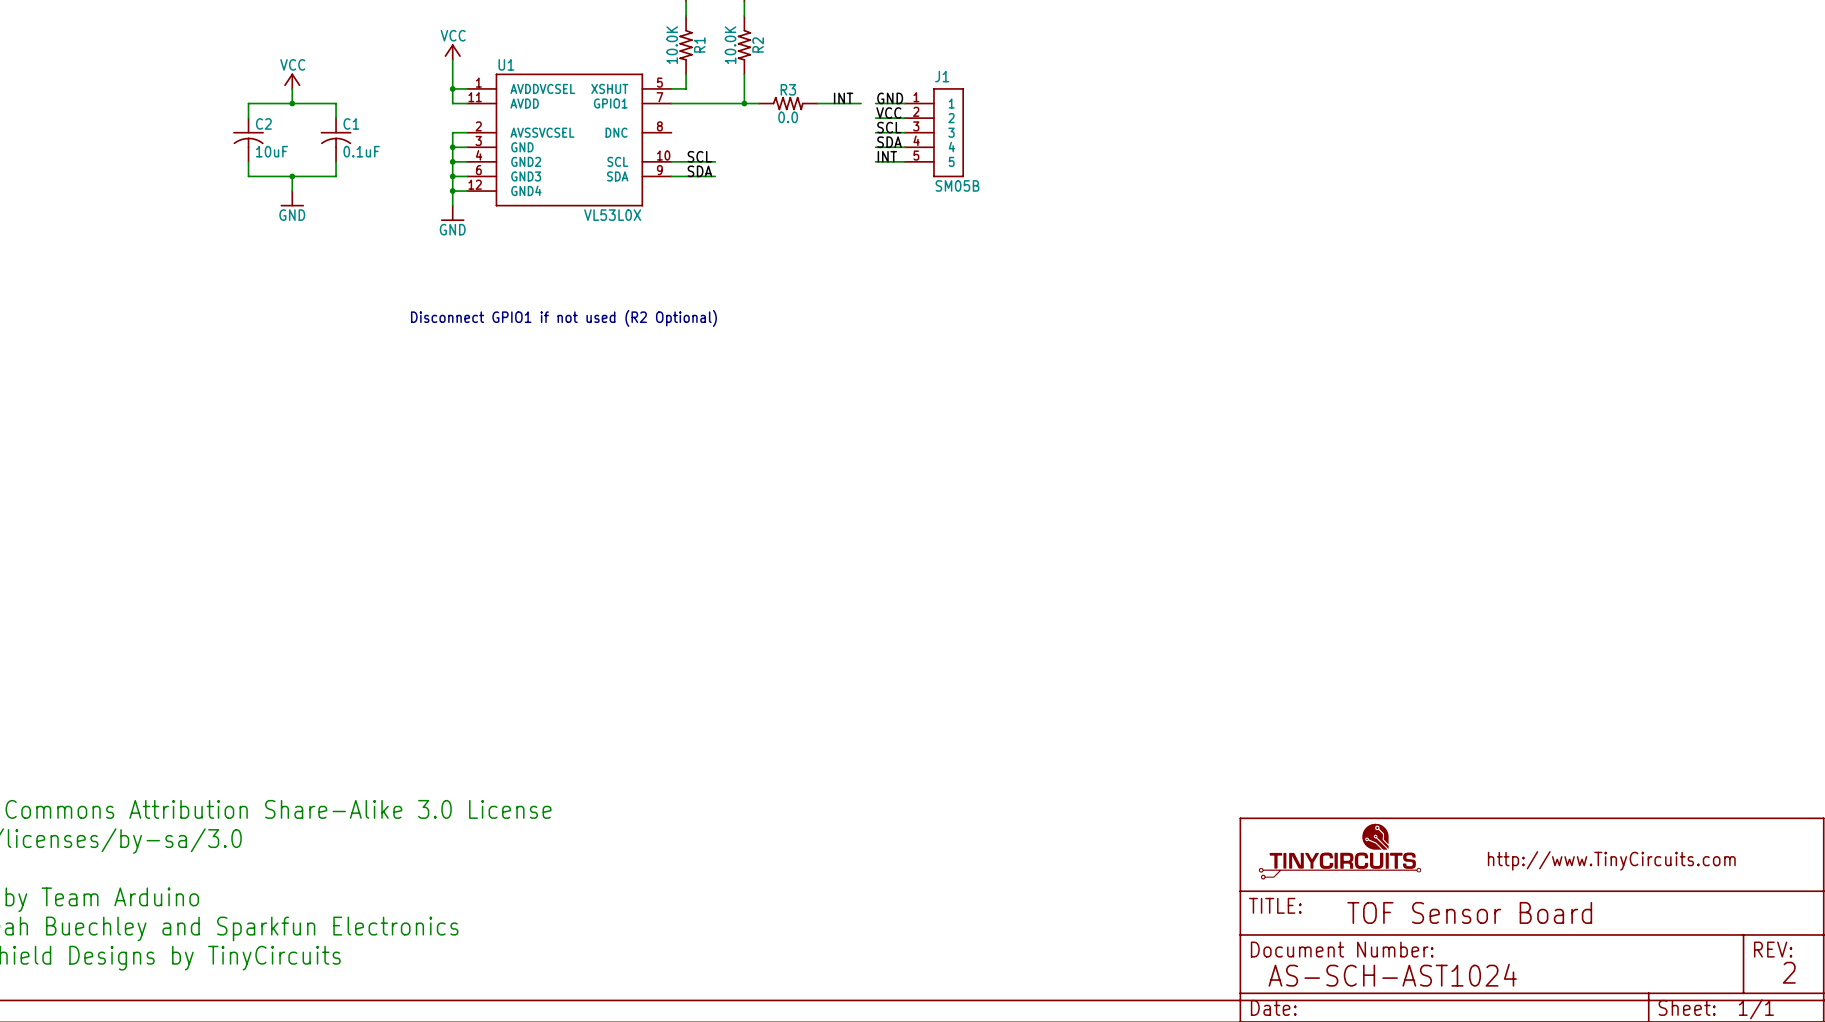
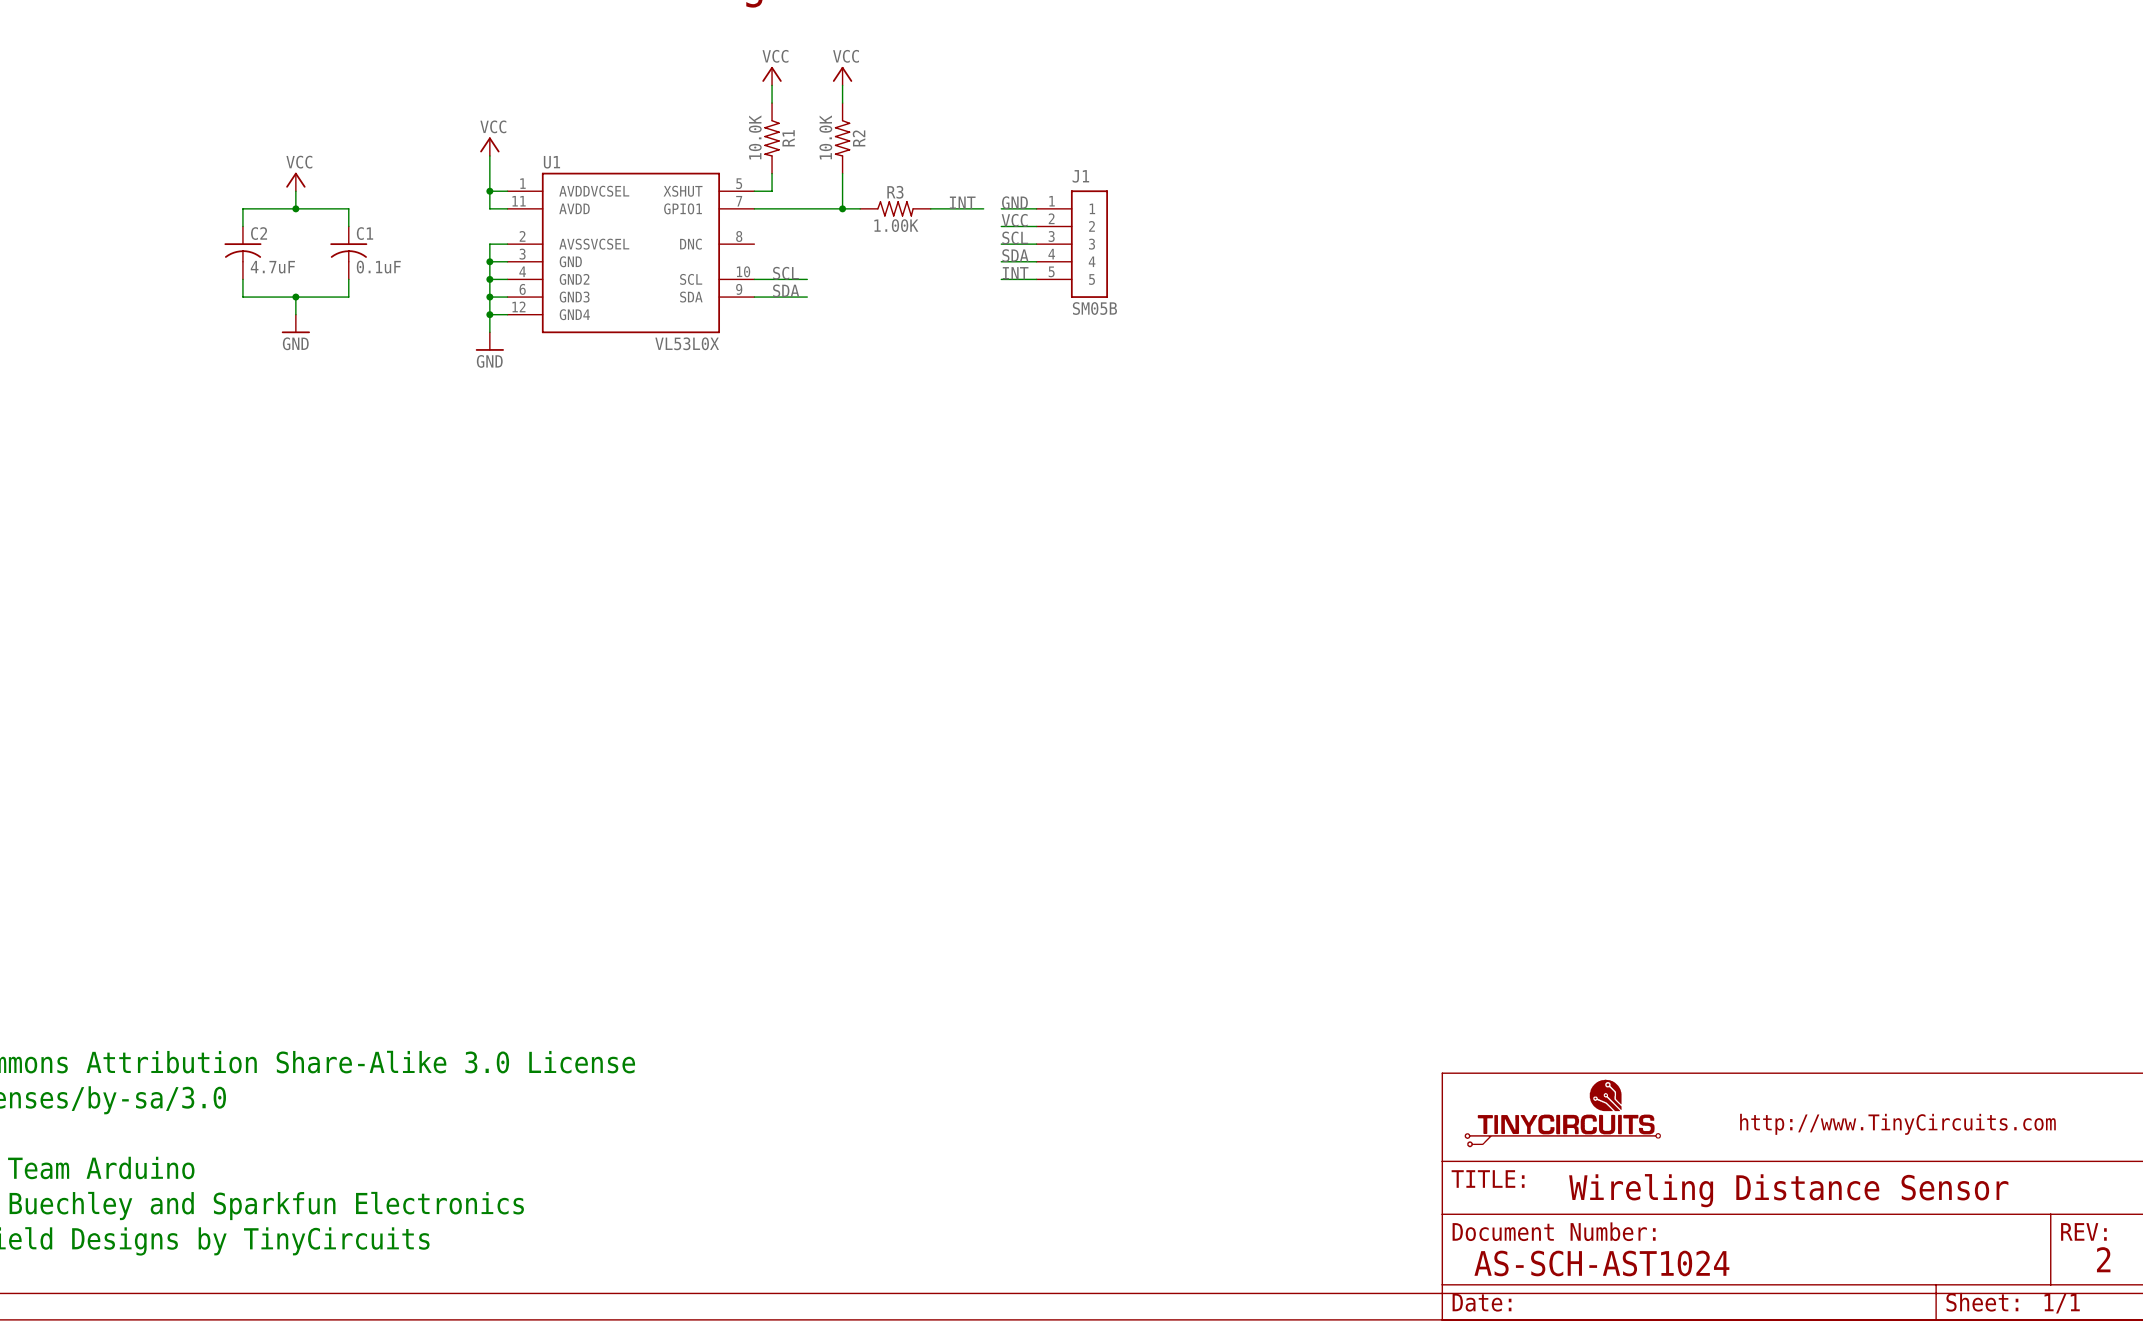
R3 value: 0.0 (788, 117) -> 1.00K (896, 225)
C2 value: 10uF (271, 151) -> 4.7uF (272, 267)
text: Disconnect GPIO1 if not used (R2 Optional) (563, 318) -> none
text: TOF Sensor Board (1469, 912) -> Wireling Distance Sensor (1788, 1190)

